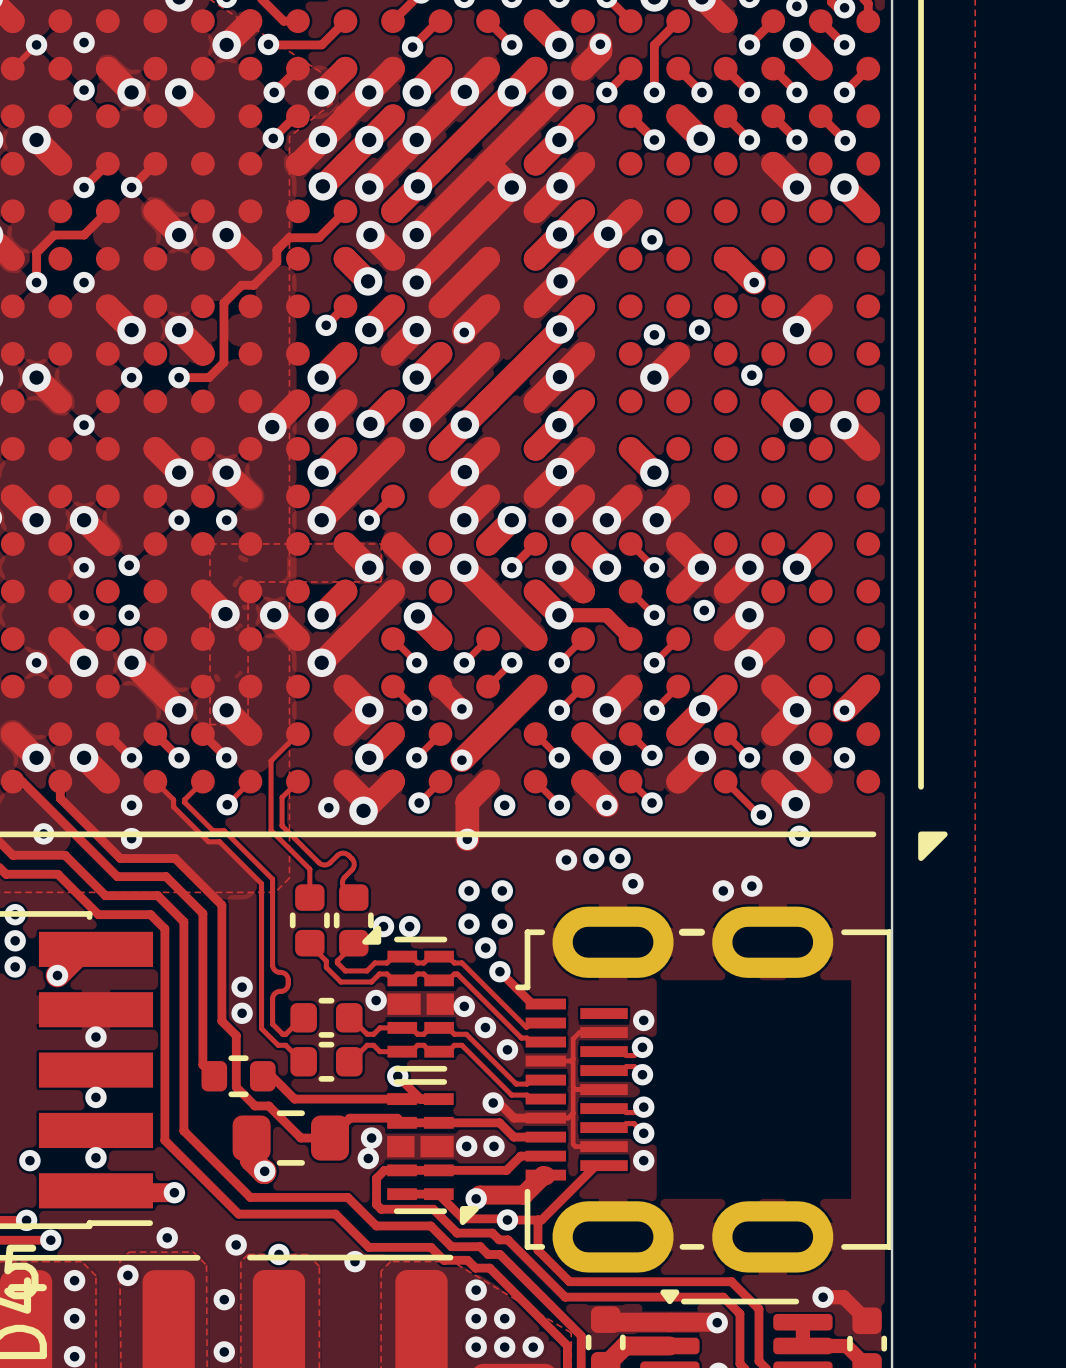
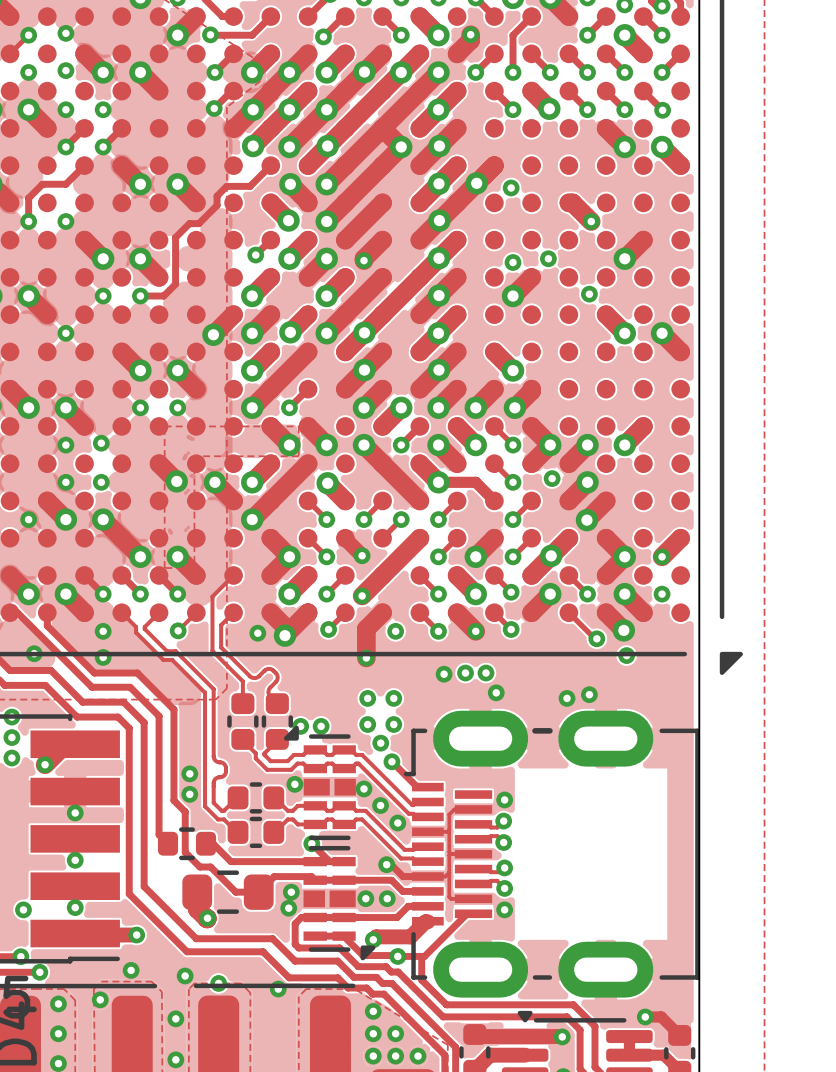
via: none -> (28, 72)
via: none -> (65, 109)
via: none -> (103, 109)

